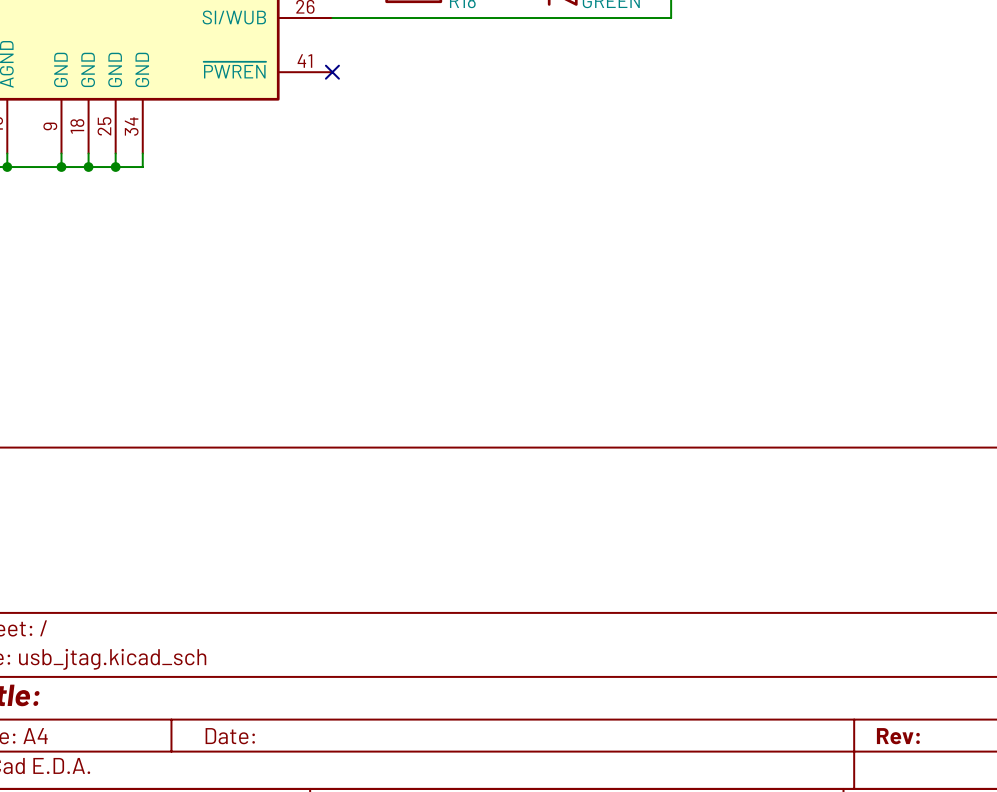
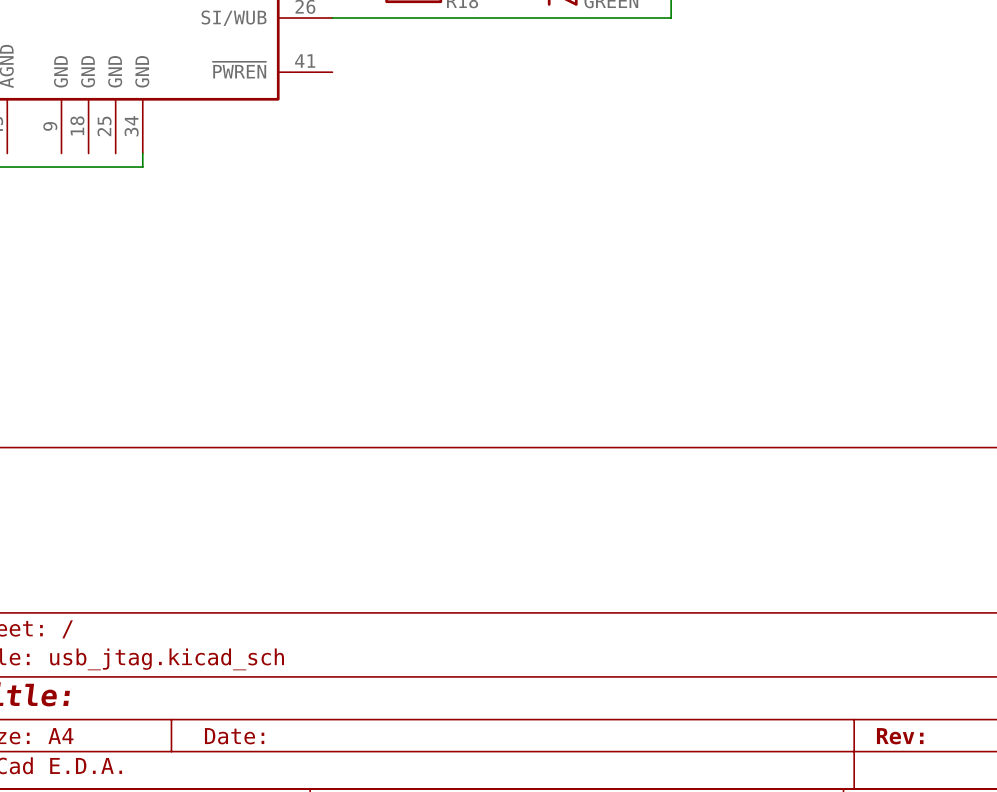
no-connect mark: (332, 72) -> none
wire: (7, 153) (7, 167) -> none
wire: (61, 153) (61, 167) -> none
wire: (88, 153) (88, 167) -> none
wire: (115, 153) (115, 167) -> none
junction: (7, 167) -> none
junction: (61, 167) -> none
junction: (88, 167) -> none
junction: (115, 167) -> none

